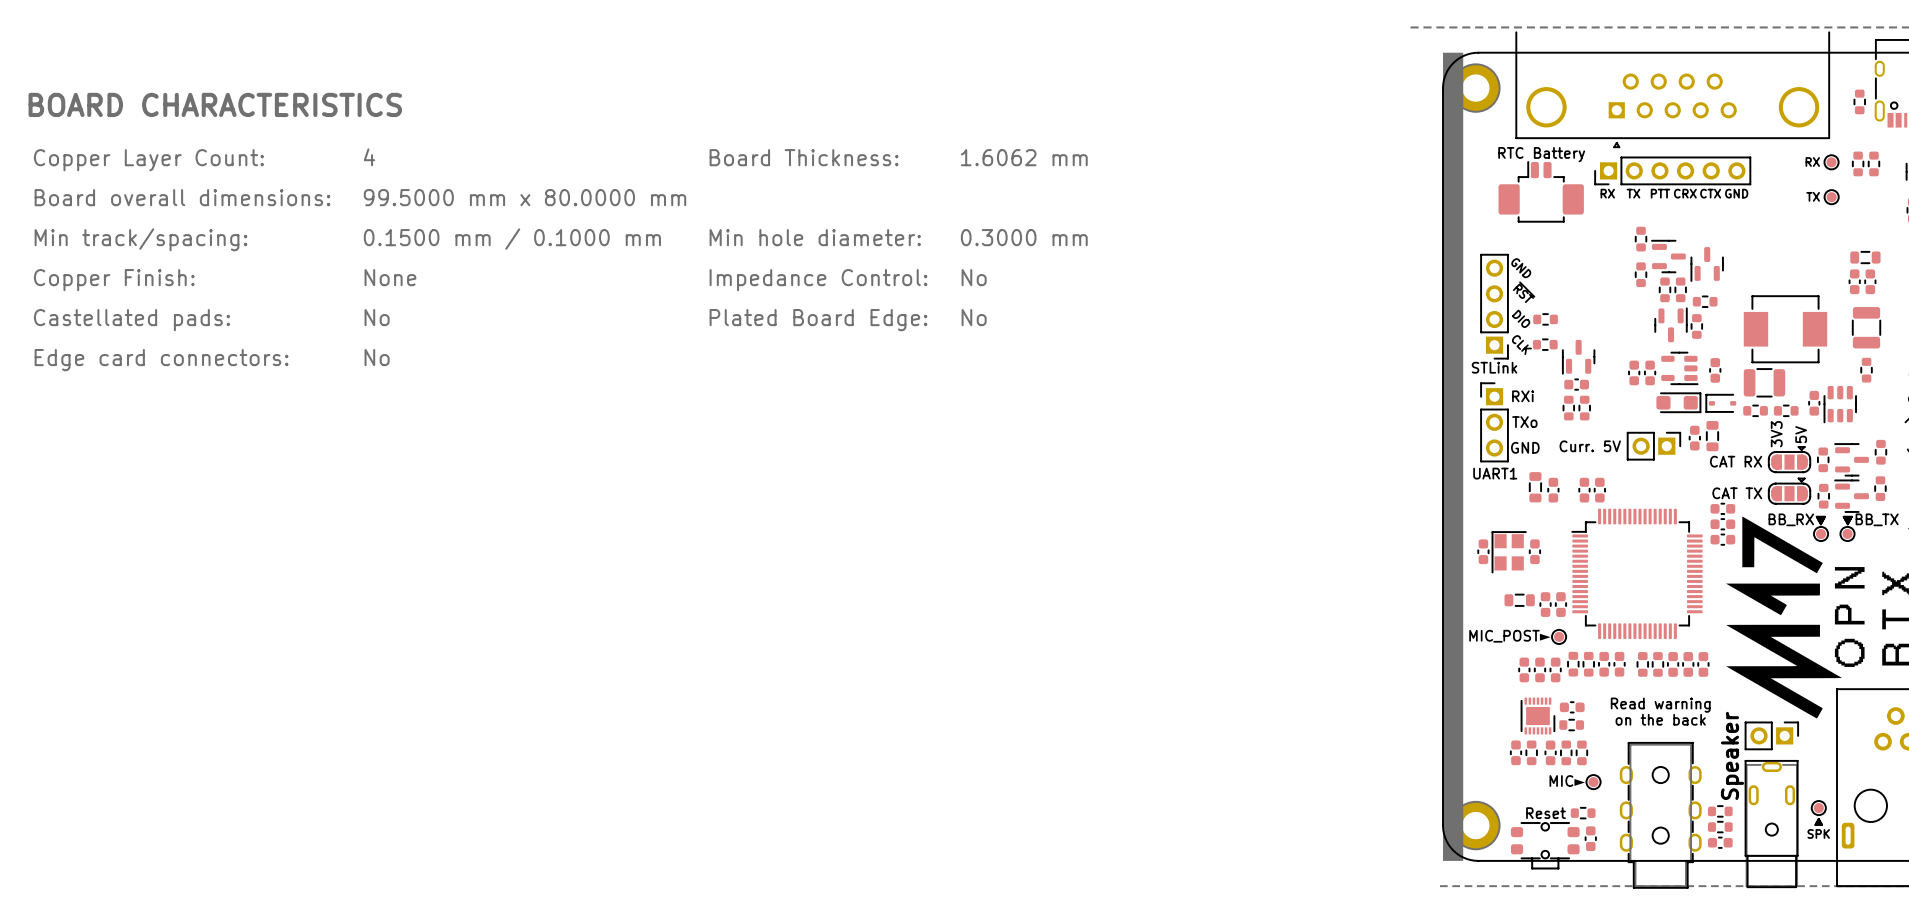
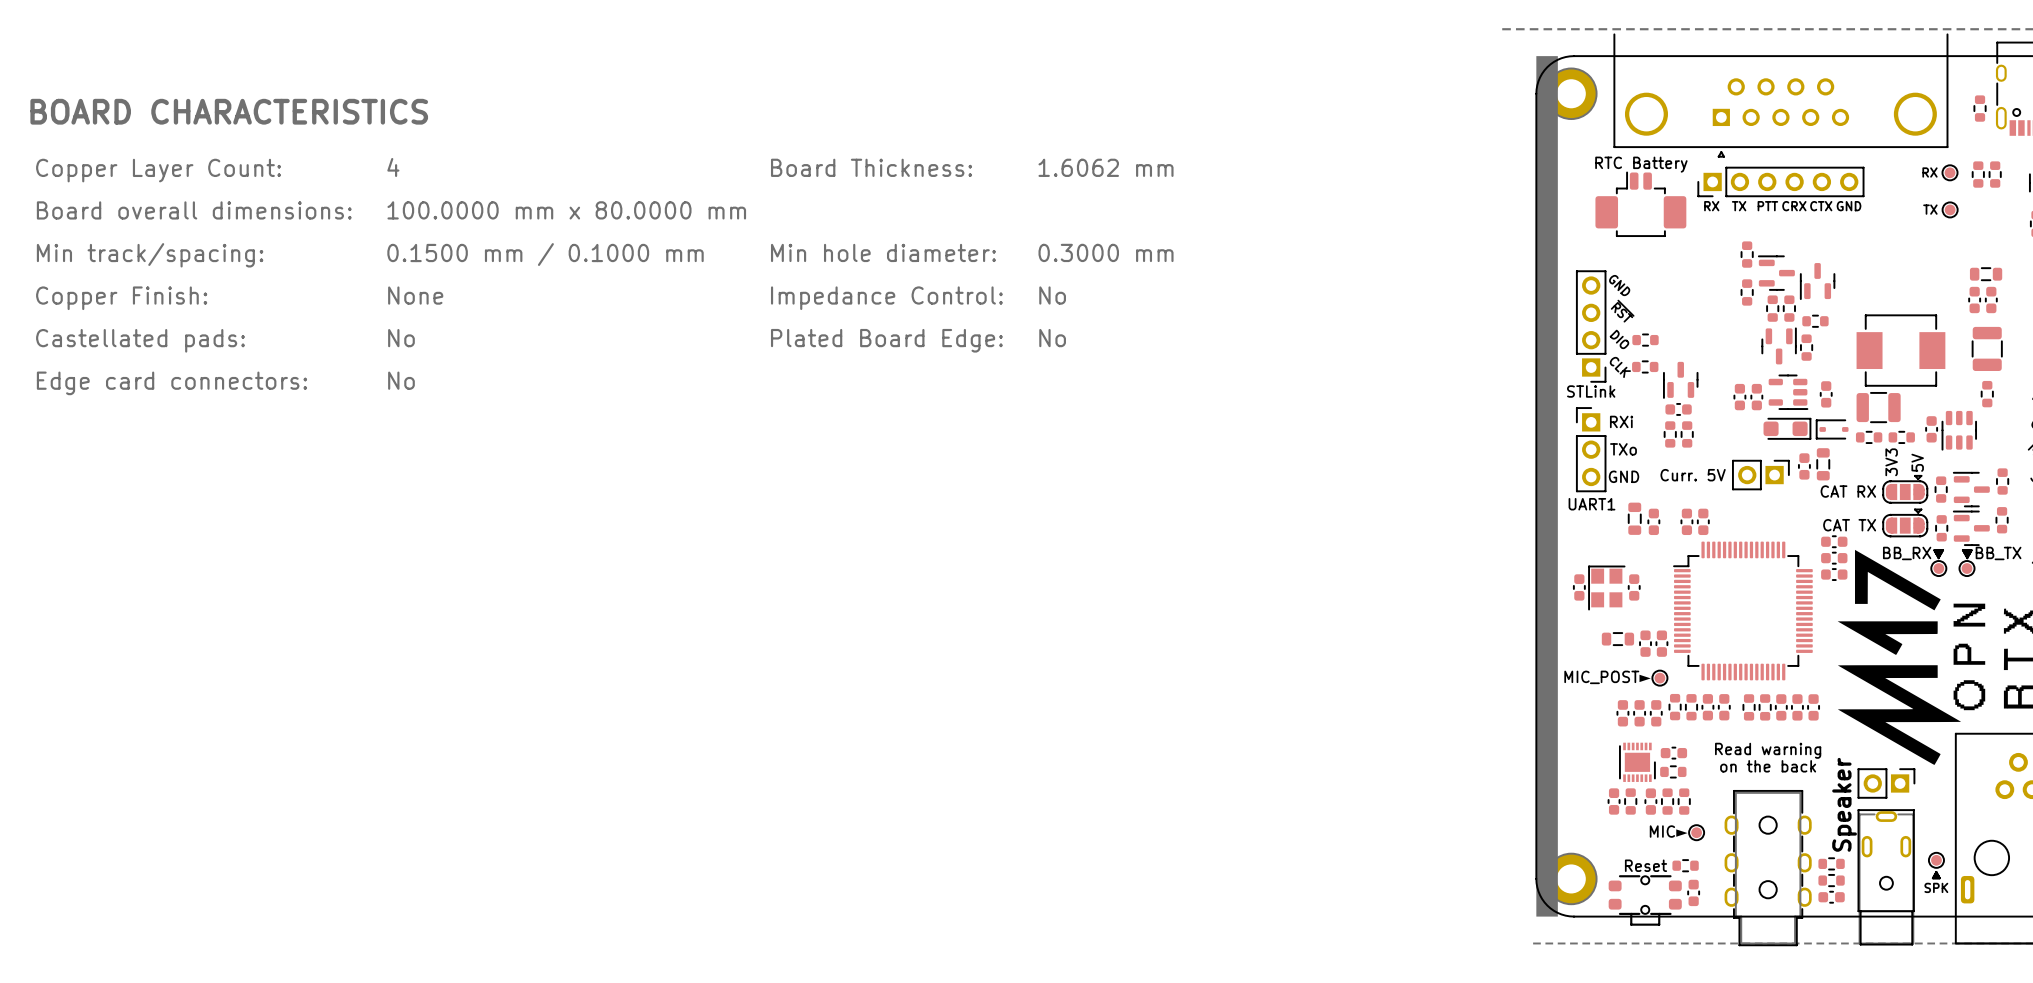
text position: Board Thickness: (804, 157) -> Board Thickness: (871, 167)
text position: 1.6062 mm (1024, 157) -> 1.6062 mm (1106, 167)
text: 99.5000 mm x 80.0000 mm (525, 197) -> 100.0000 mm x 80.0000 mm (566, 210)
text position: Min hole diameter: (815, 237) -> Min hole diameter: (883, 252)
text position: 0.3000 mm (1024, 237) -> 0.3000 mm (1106, 252)
text position: No (974, 277) -> No (1052, 295)
text position: Impedance Control: (818, 280) -> Impedance Control: (886, 298)
text position: No (974, 317) -> No (1052, 338)
text position: Plated Board Edge: (818, 320) -> Plated Board Edge: (886, 340)

